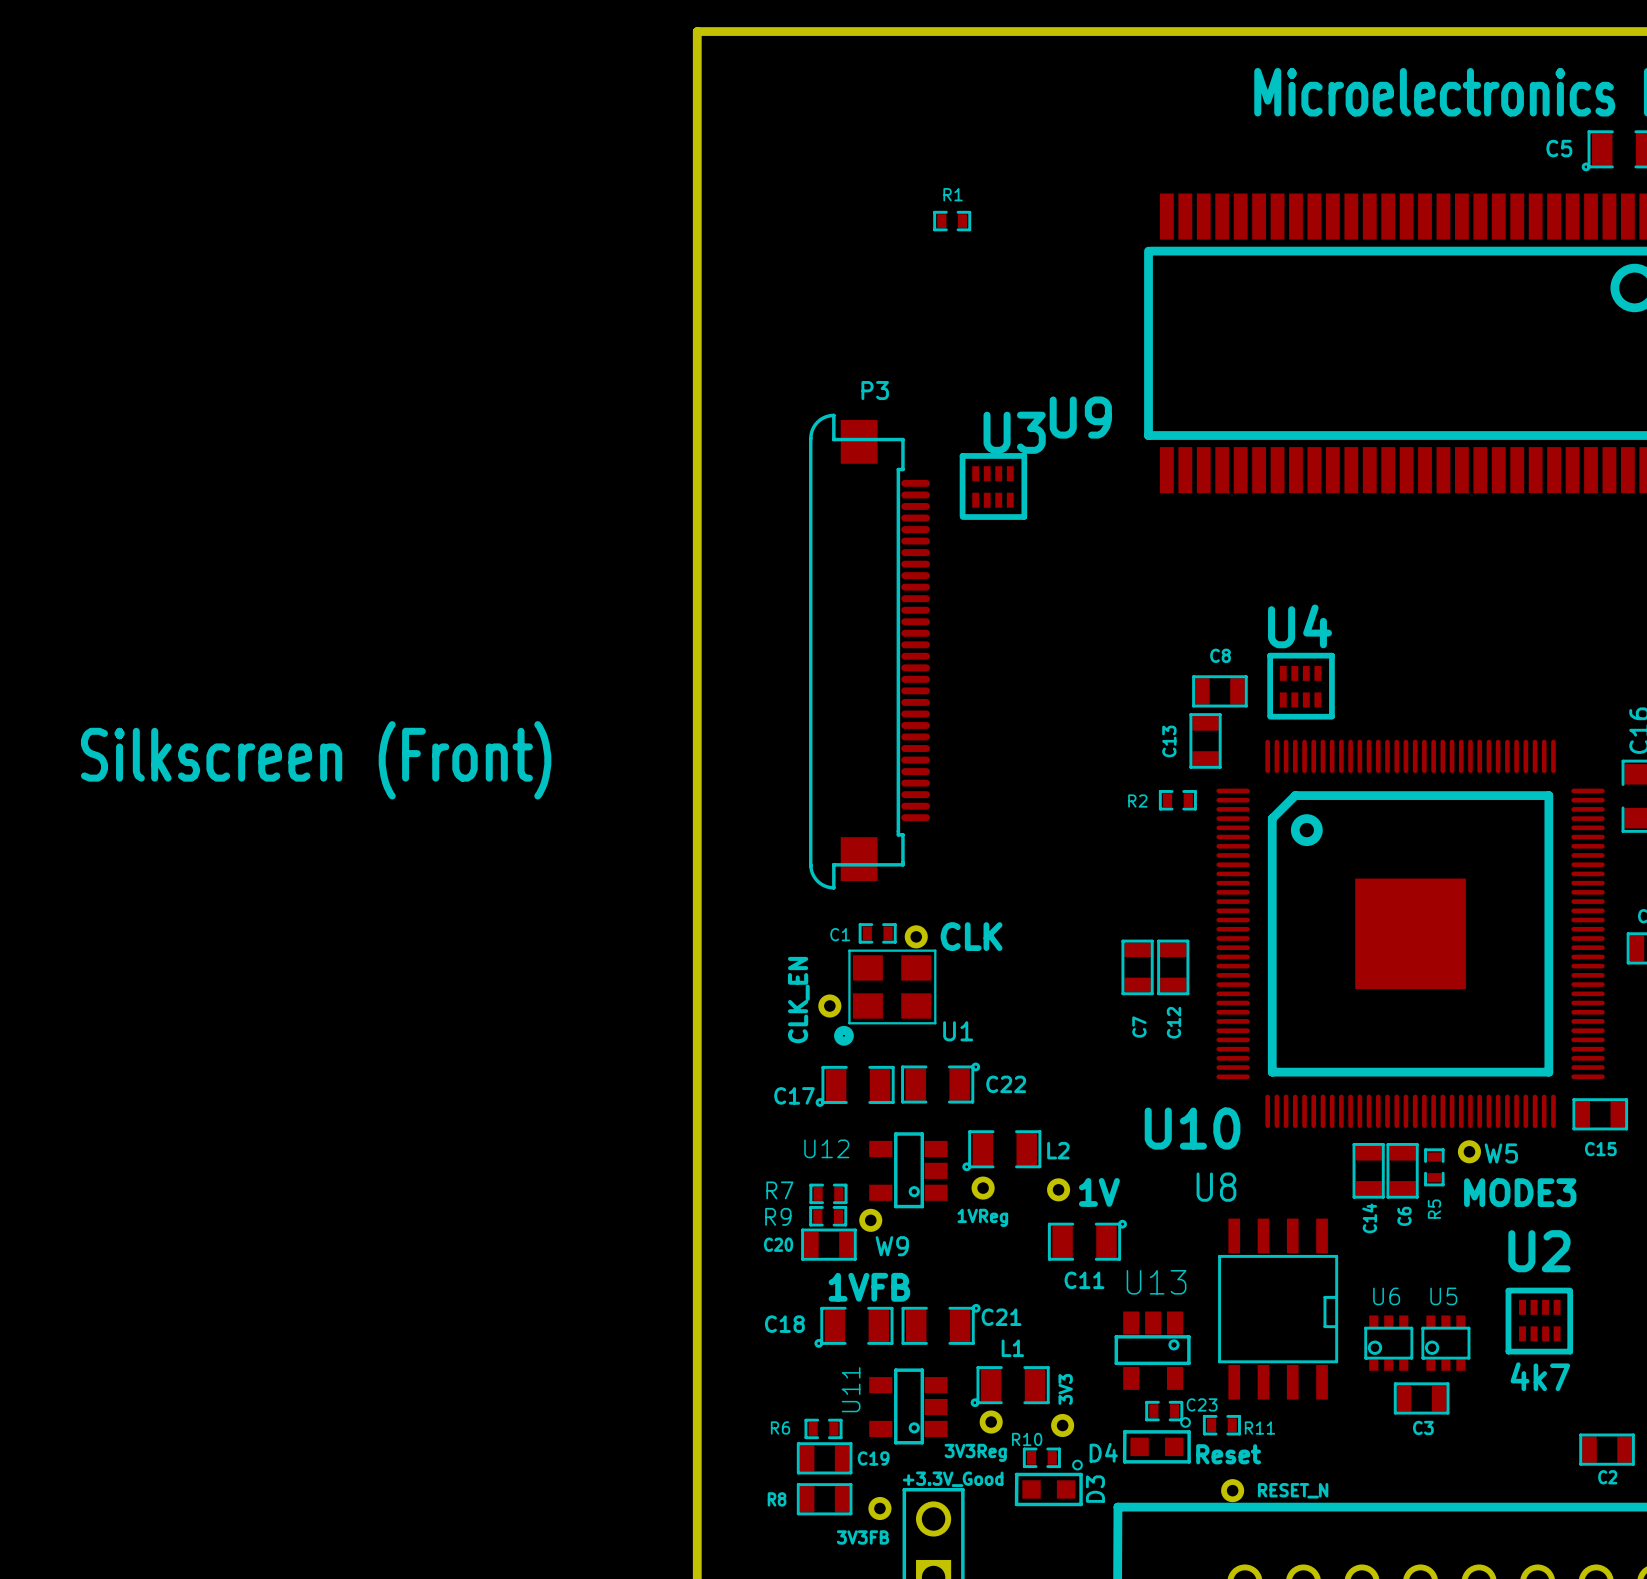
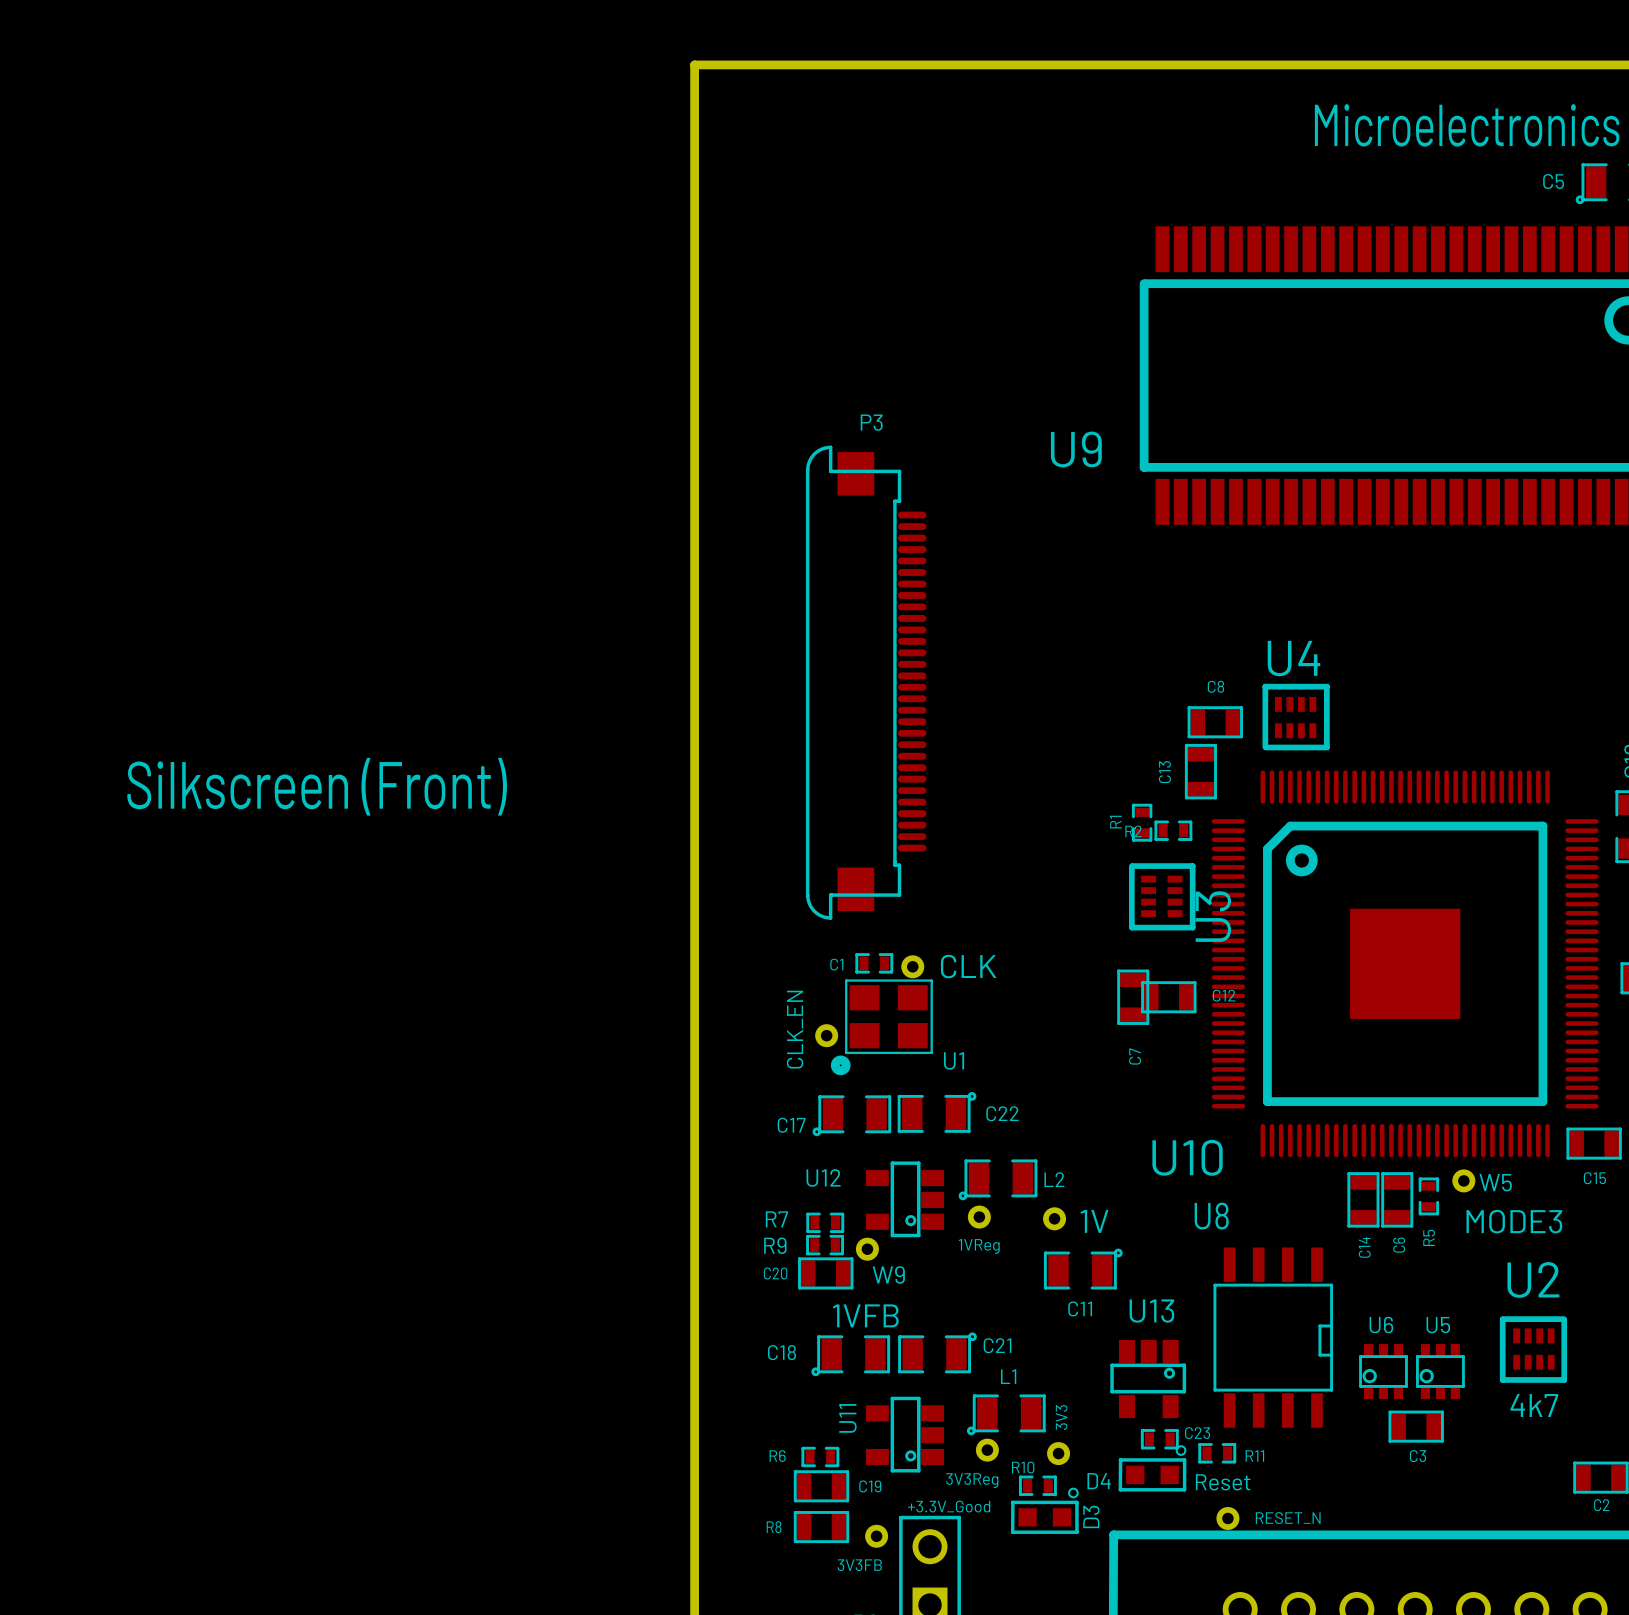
R1 rotation: 0° (952, 221) -> 90° clockwise (1142, 822)
R1 position: (952, 221) -> (1142, 822)
U3 rotation: 0° (993, 486) -> 90° clockwise (1162, 896)
U3 position: (993, 486) -> (1162, 896)
C12 rotation: 0° (1173, 967) -> 90° clockwise (1168, 997)
C12 name position: C12 (1174, 1022) -> C12 (1224, 995)

